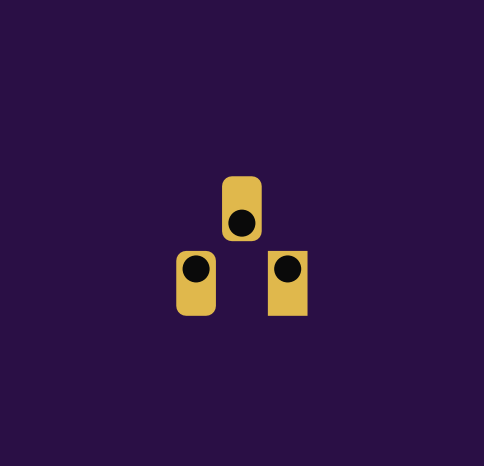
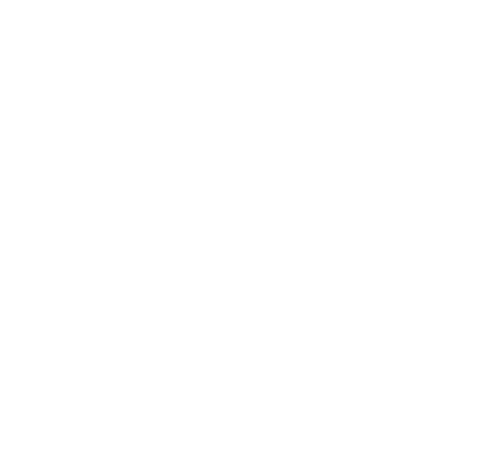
part: (241, 246) -> none

